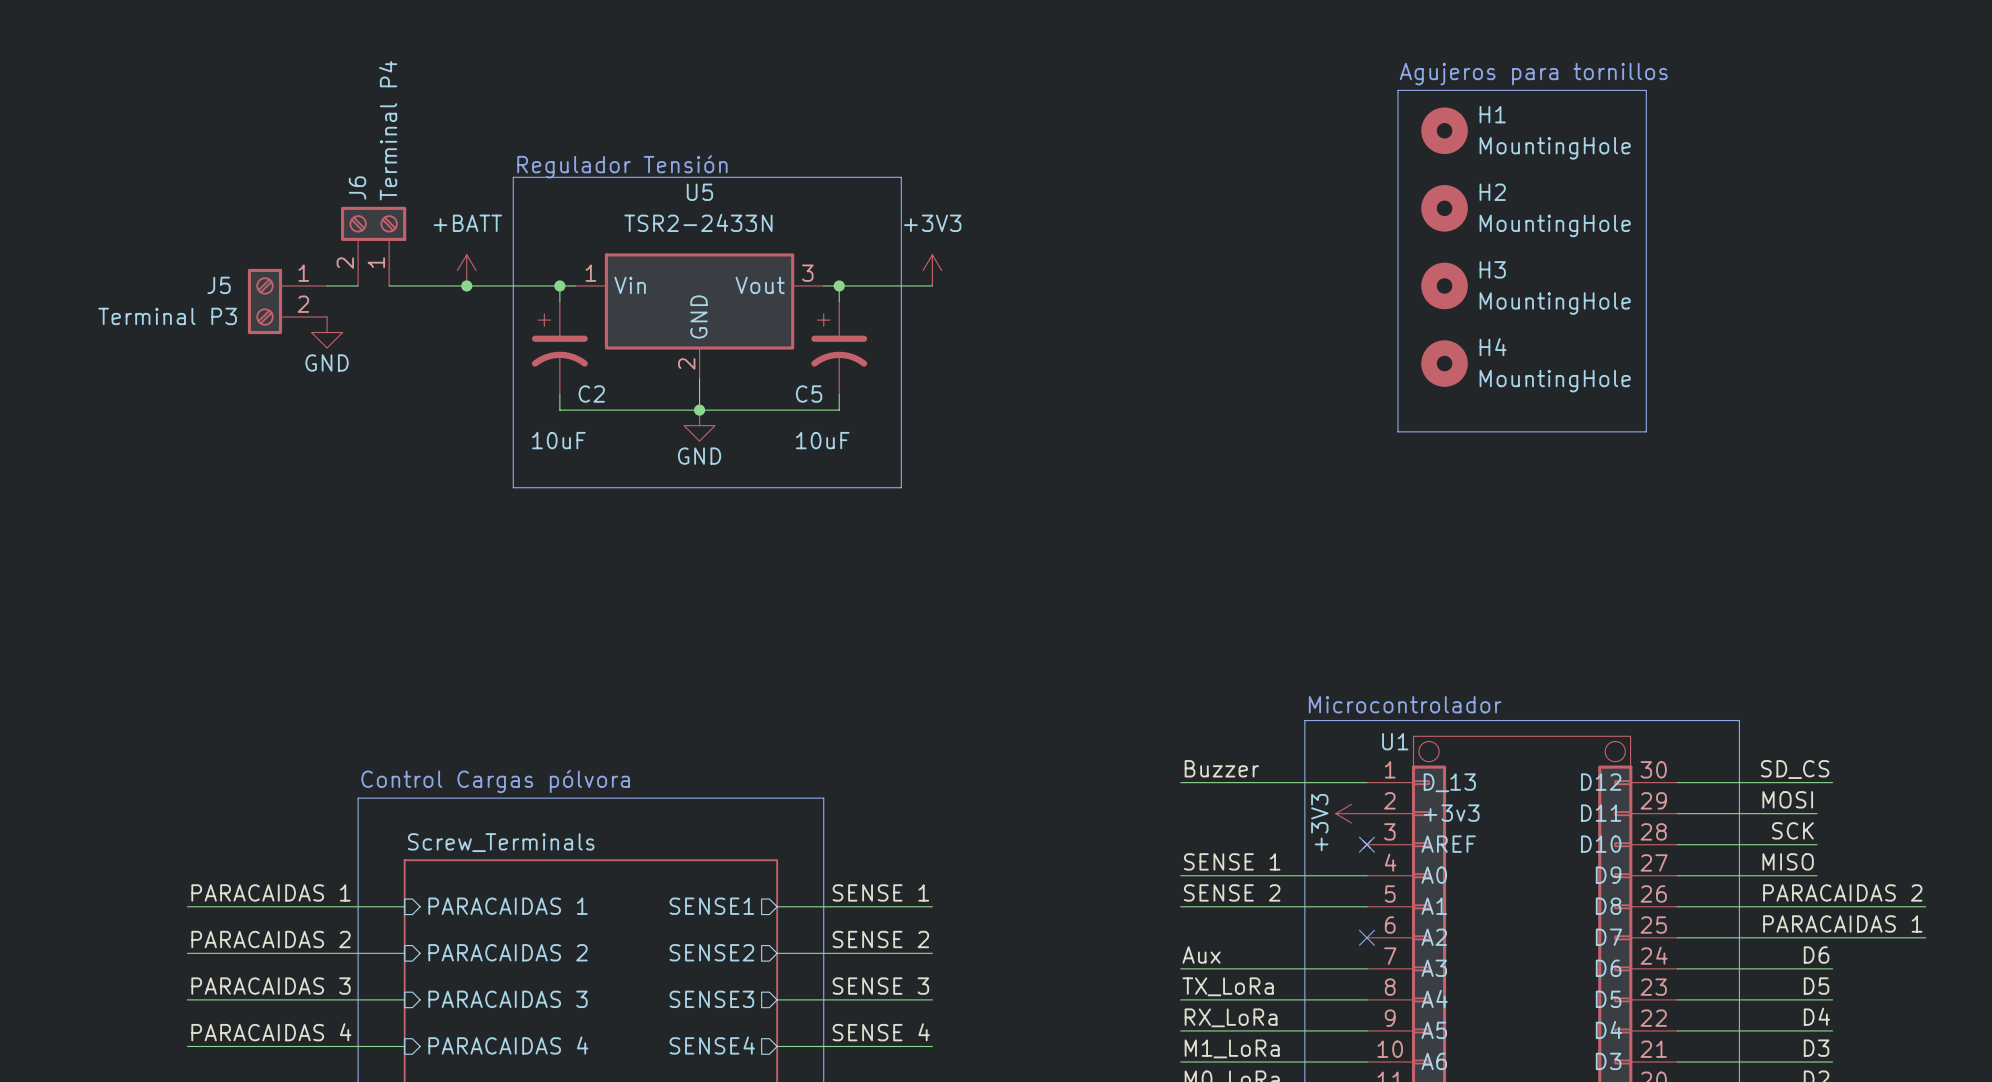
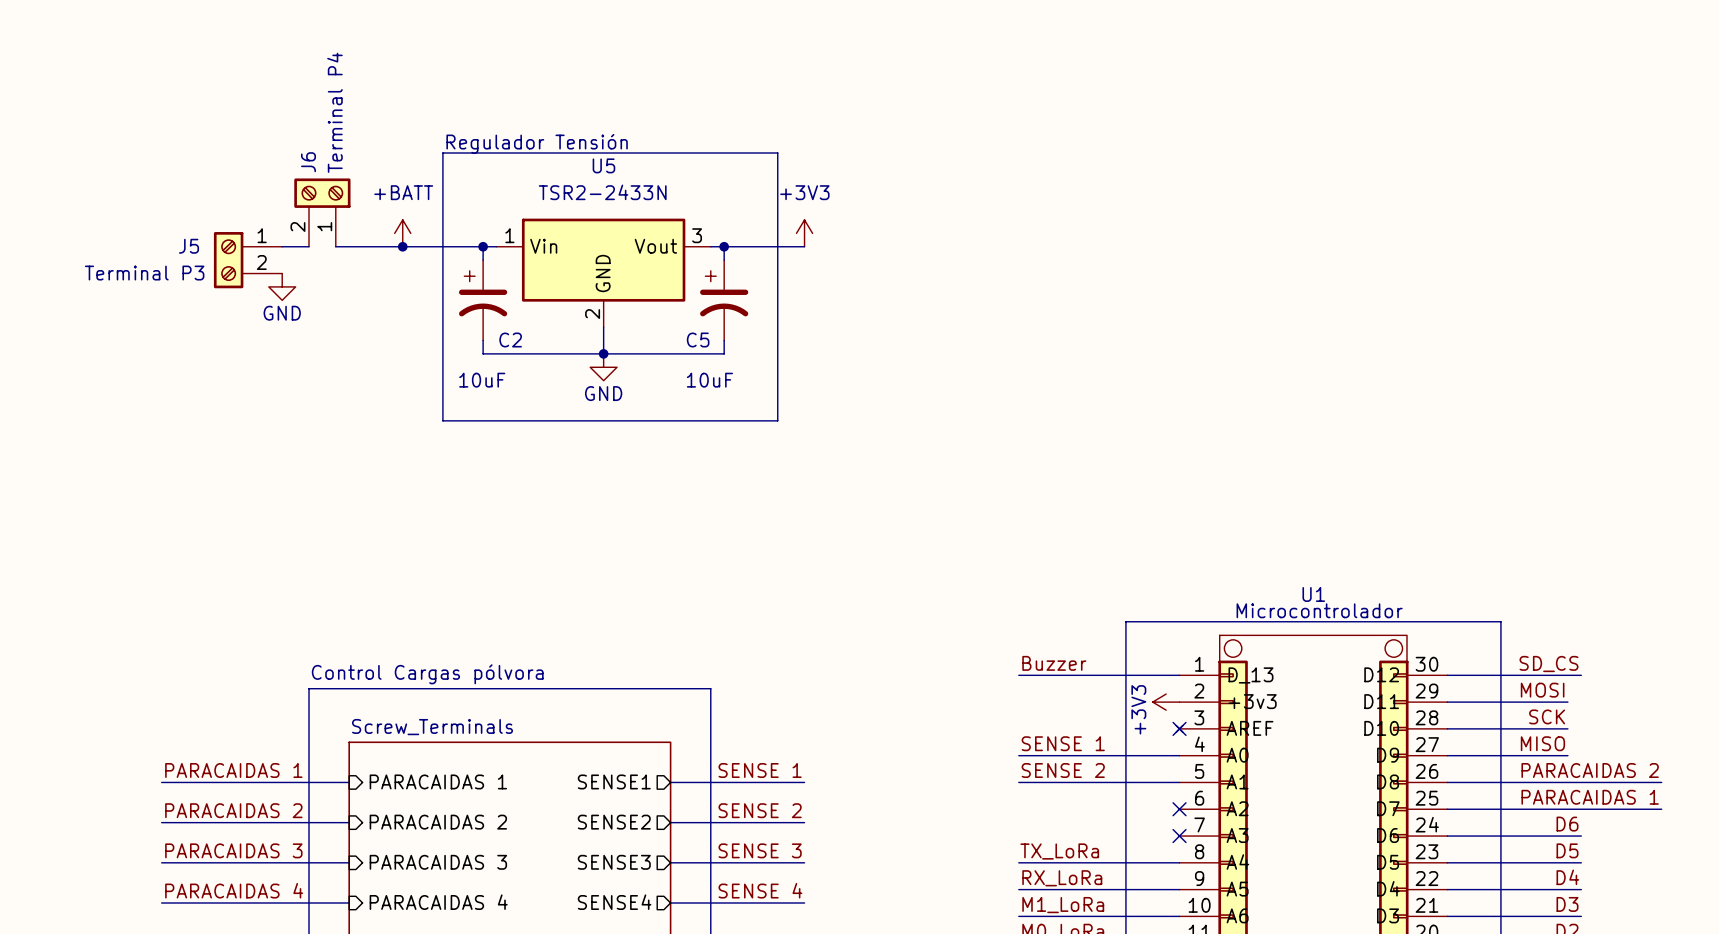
text: Agujeros para tornillos (1533, 74) -> none
line: (1397, 90) (1646, 90) (1646, 431) (1397, 431) (1397, 90) -> none
H1: MountingHole (1444, 130) -> none
H2: MountingHole (1444, 208) -> none
H3: MountingHole (1444, 285) -> none
H4: MountingHole (1444, 363) -> none
text position: Microcontrolador (1405, 704) -> Microcontrolador (1319, 610)
U1 name position: U1 (1395, 741) -> U1 (1313, 594)
label: Aux (1201, 955) -> none
wire: (1180, 968) (1366, 968) -> none
no-connect mark: none -> (1179, 836)

